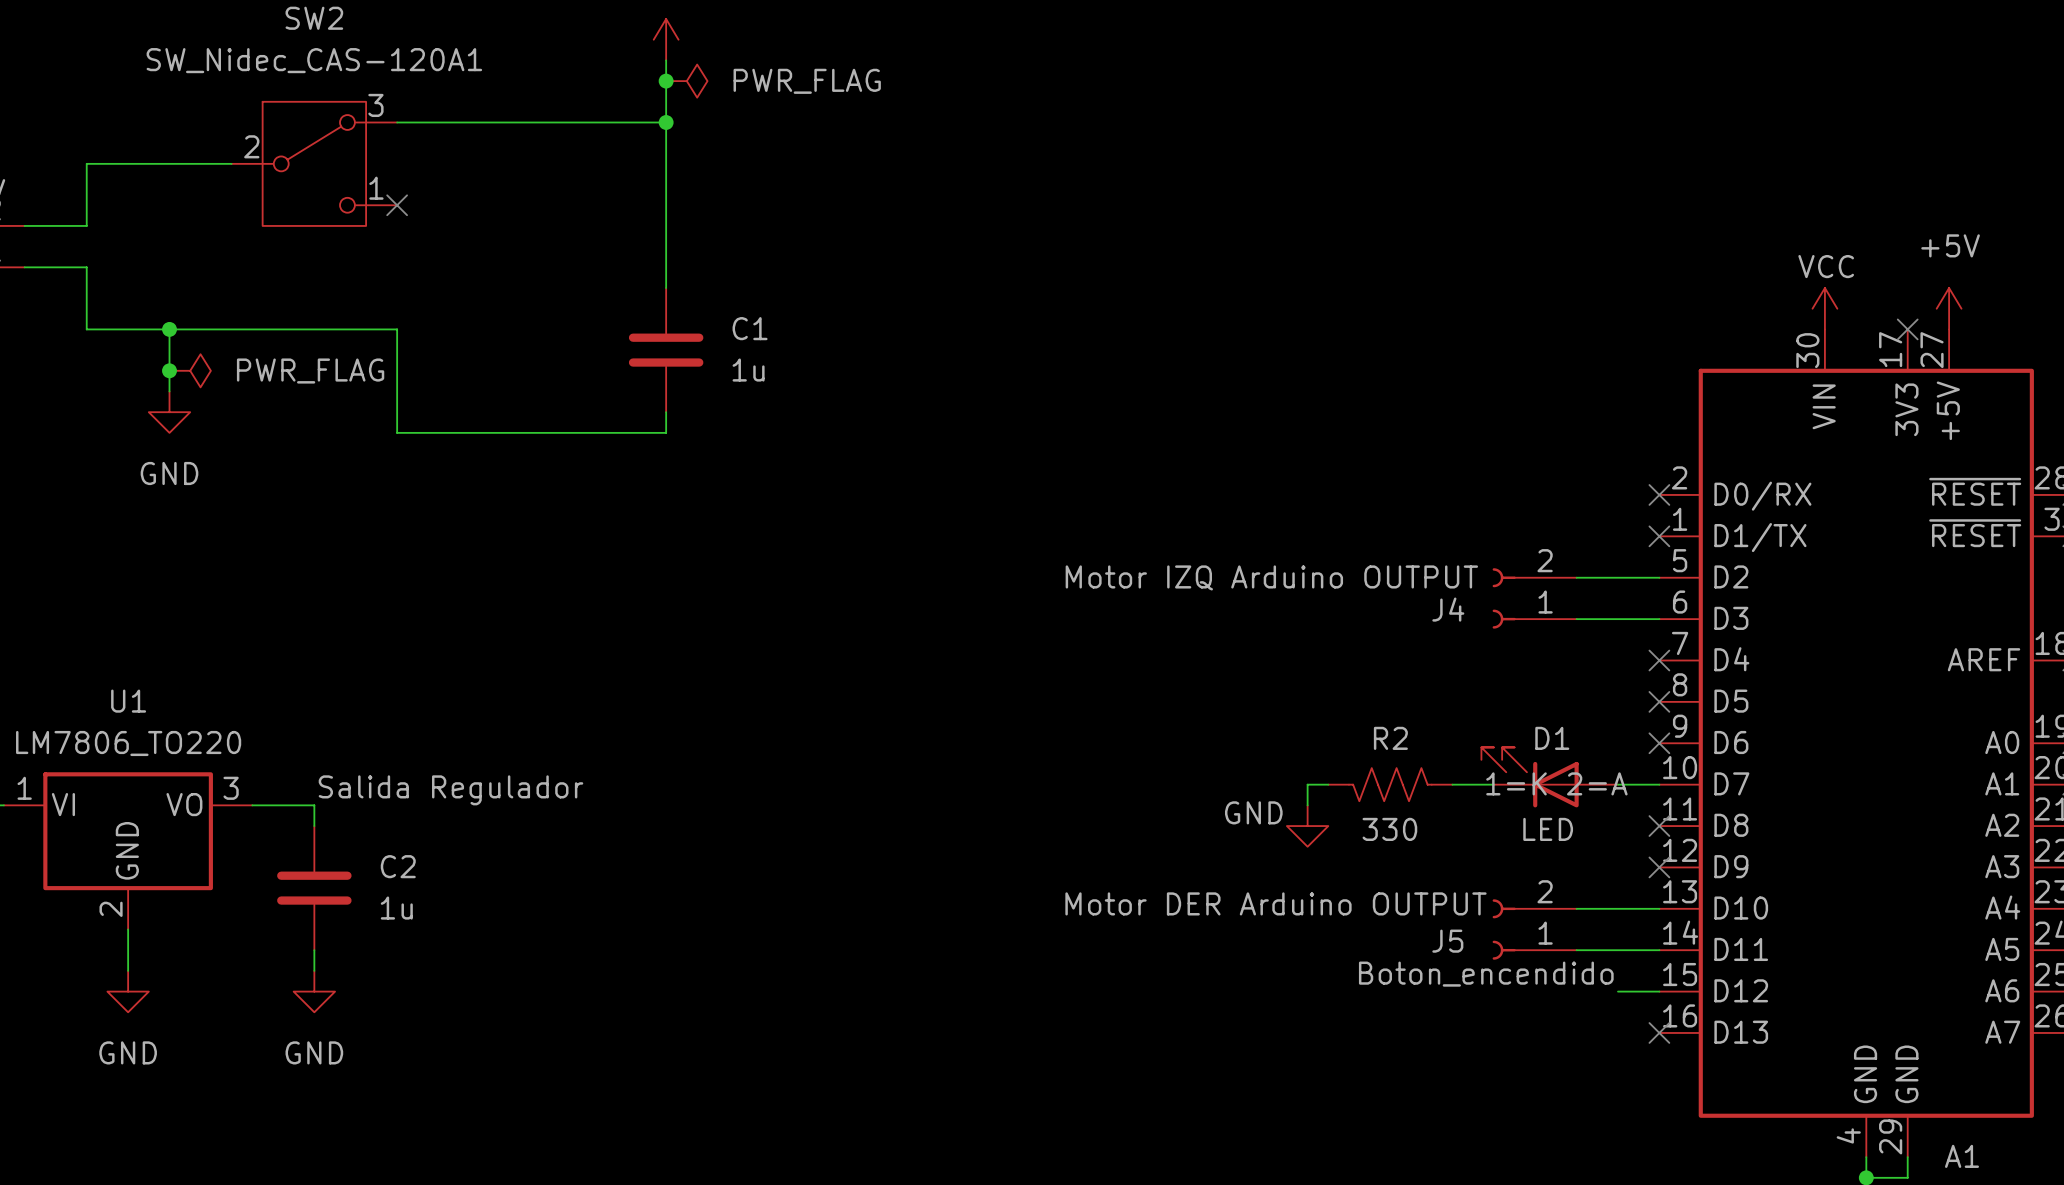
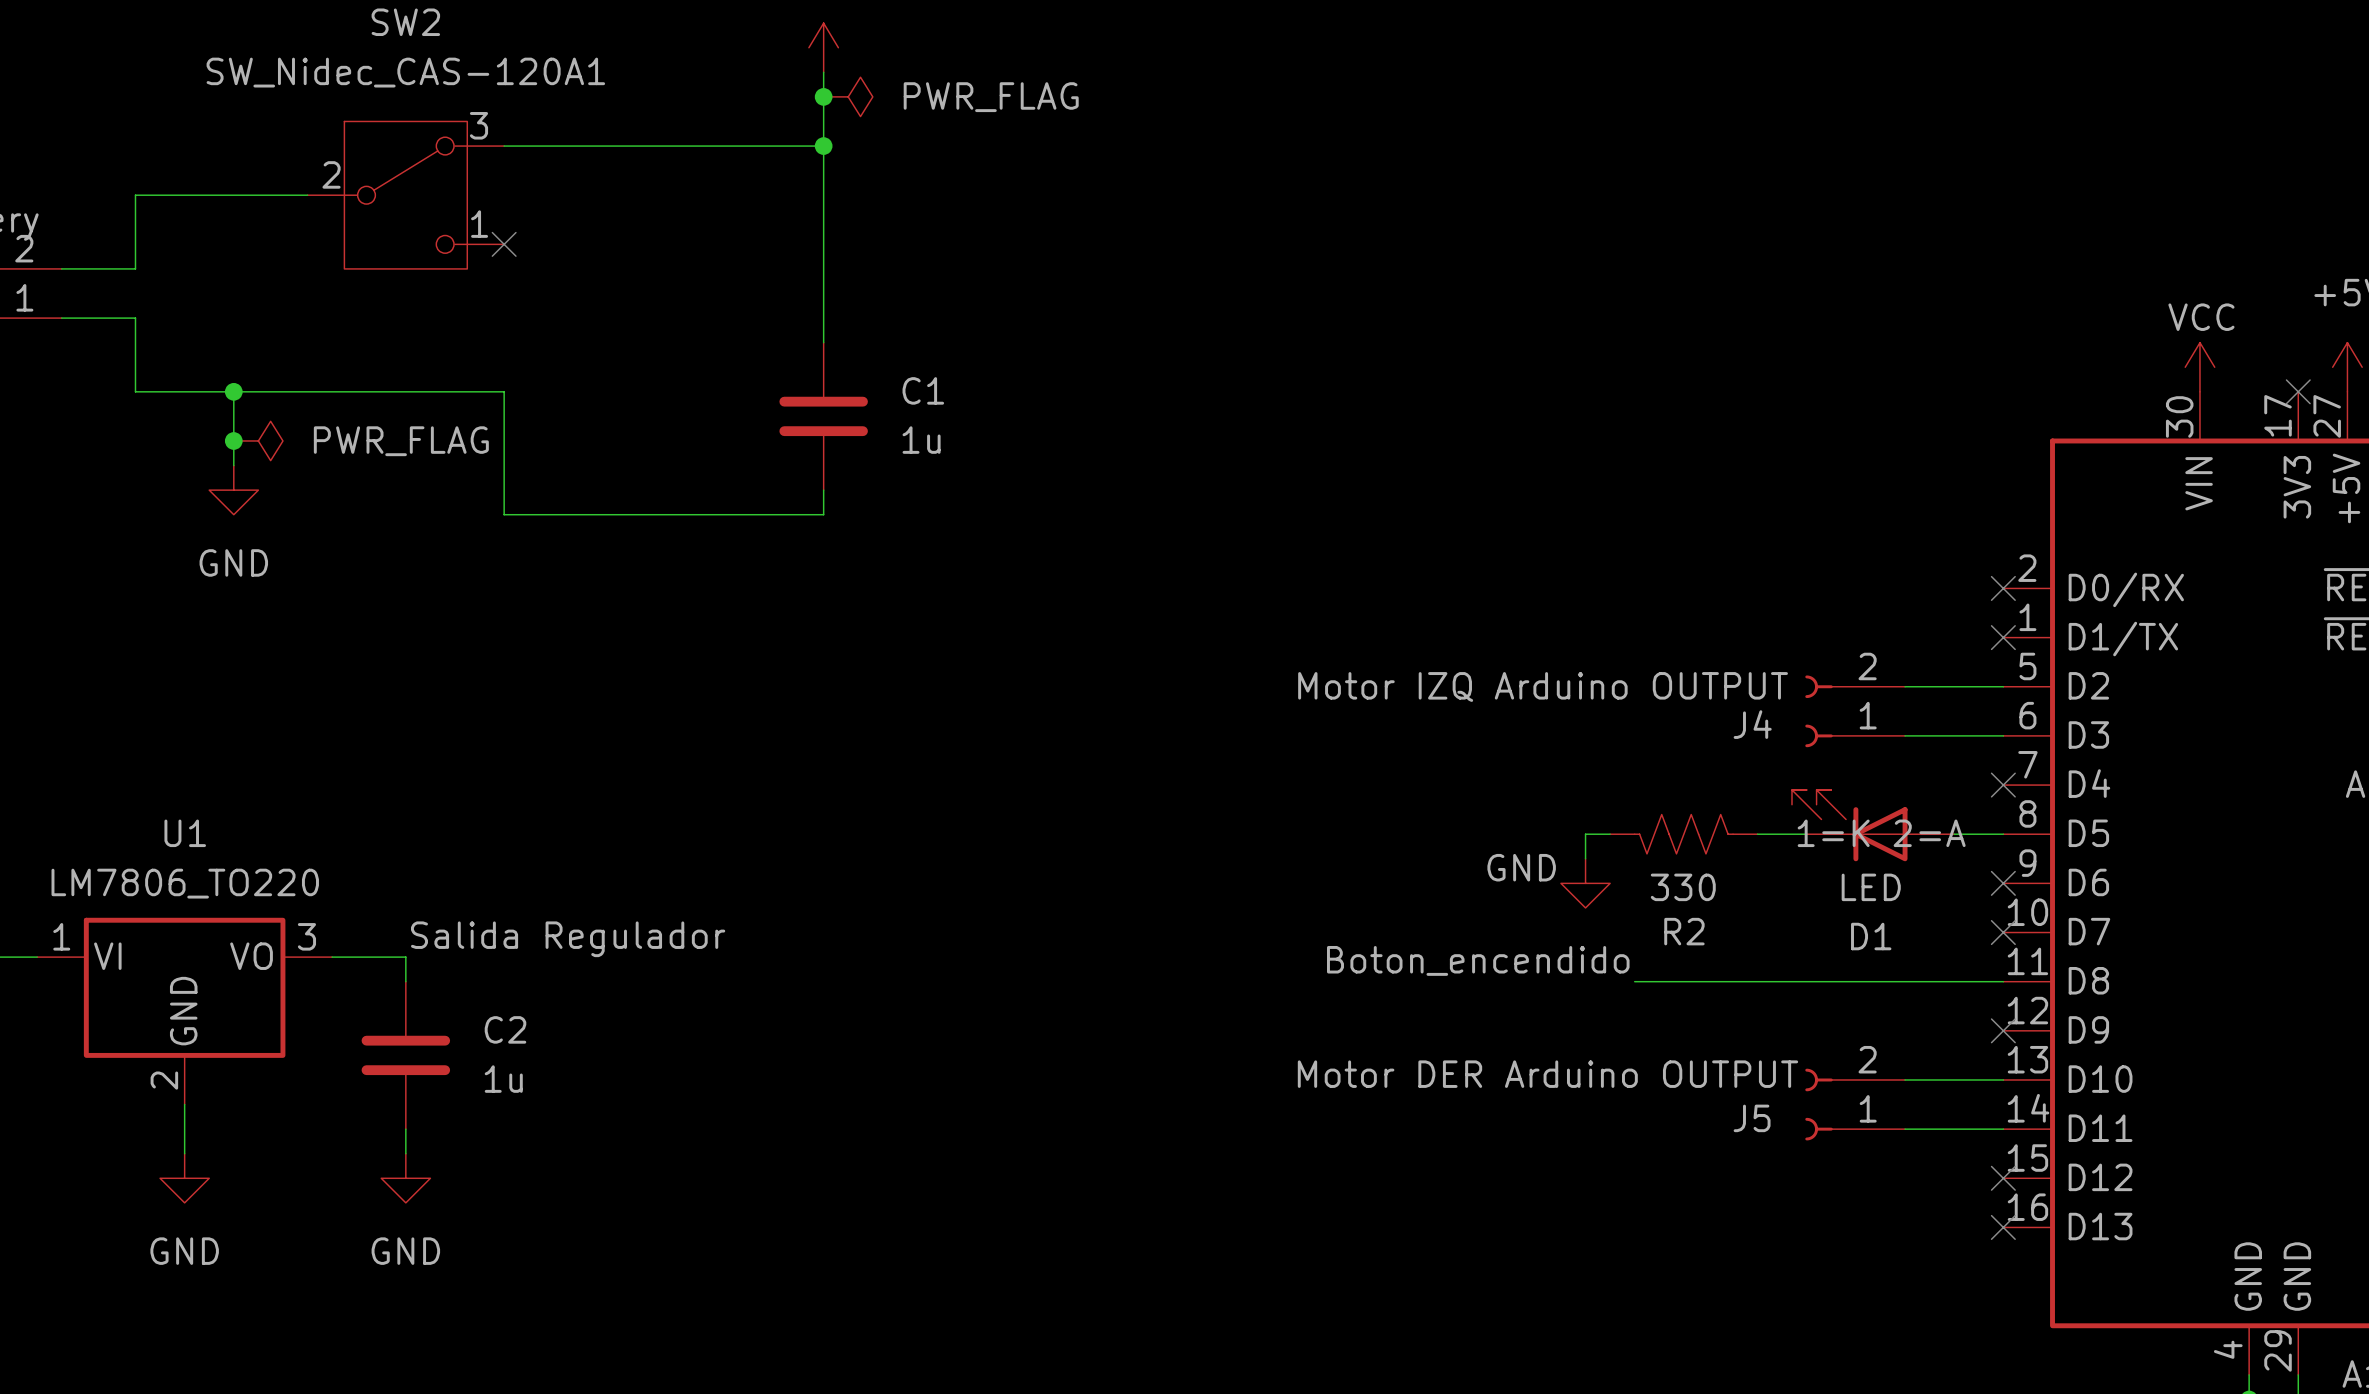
no-connect mark: (1659, 701) -> none
R2 name position: R2 (1390, 738) -> R2 (1684, 931)
D1 name position: D1 (1552, 738) -> D1 (1871, 936)
D1 position: (1549, 777) -> (1873, 825)
wire: (1328, 784) (1307, 784) (1307, 805) -> (1610, 834) (1585, 834) (1585, 858)
R2 position: (1390, 784) -> (1683, 834)
wire: (1452, 784) (1493, 784) -> (1757, 834) (1806, 834)
wire: (1618, 784) (1659, 784) -> (1954, 834) (2003, 834)
no-connect mark: none -> (2003, 932)
power symbol position: GND (1307, 826) -> GND (1585, 883)
wire: none -> (1634, 981) (2003, 981)
no-connect mark: (1659, 826) -> none
label position: Boton_encendido (1486, 974) -> Boton_encendido (1478, 960)
wire: (1618, 991) (1659, 991) -> none
no-connect mark: none -> (2003, 1178)

